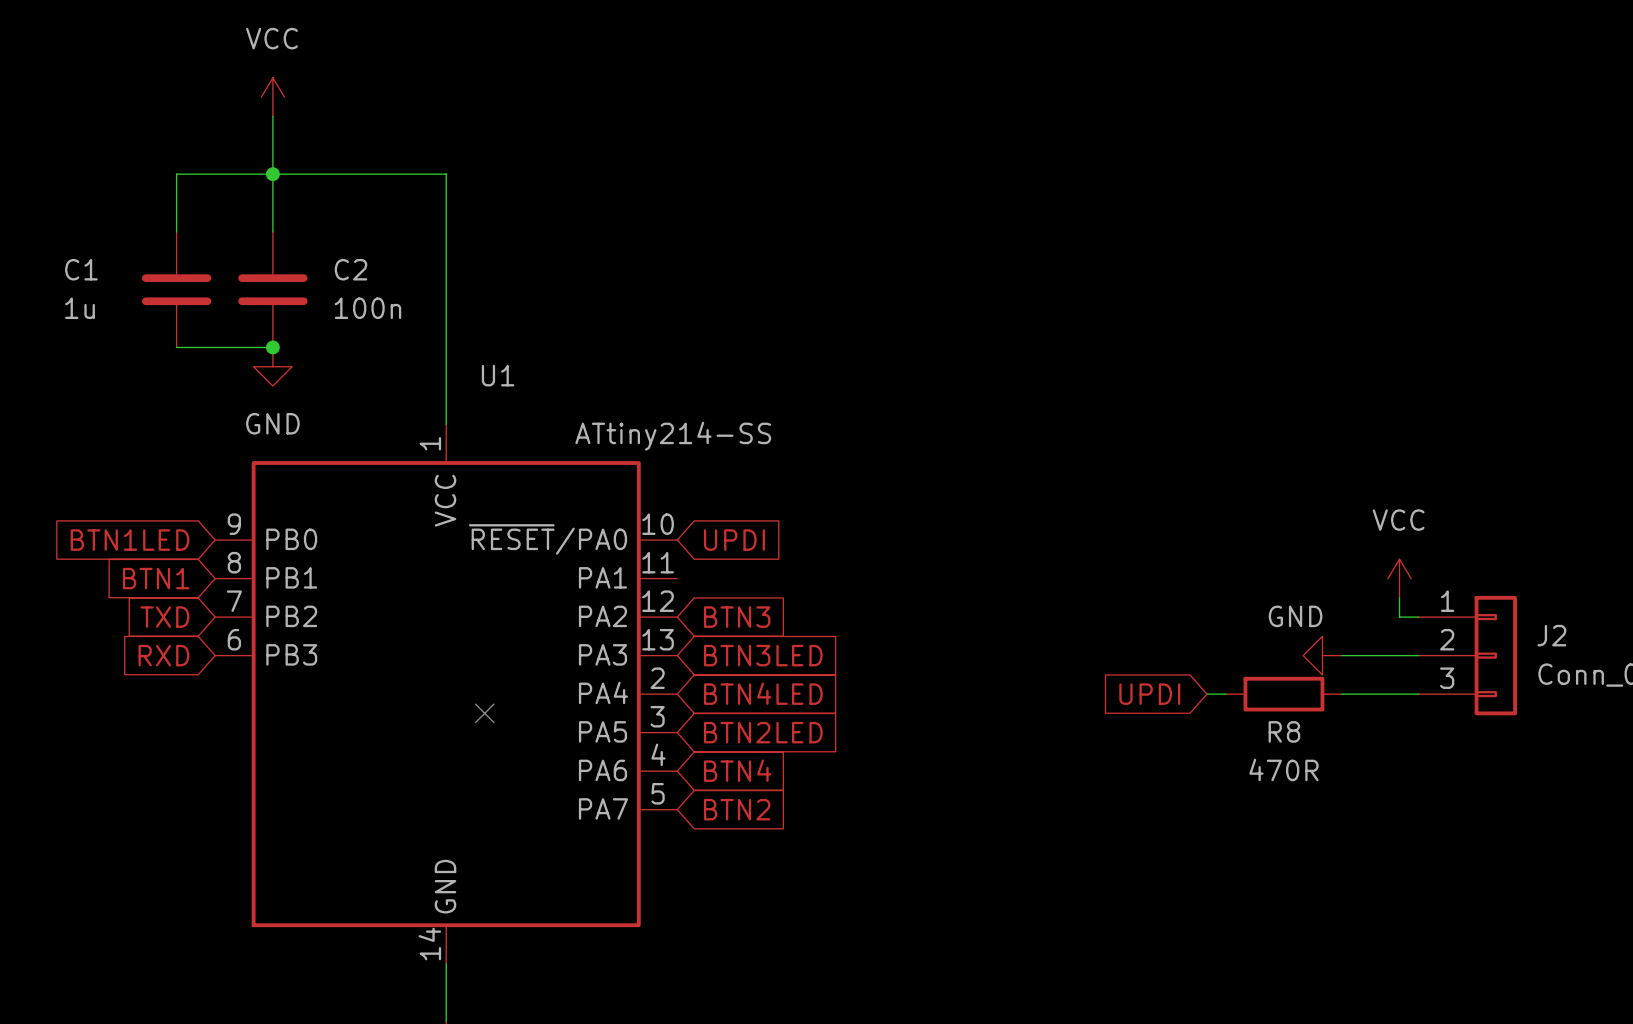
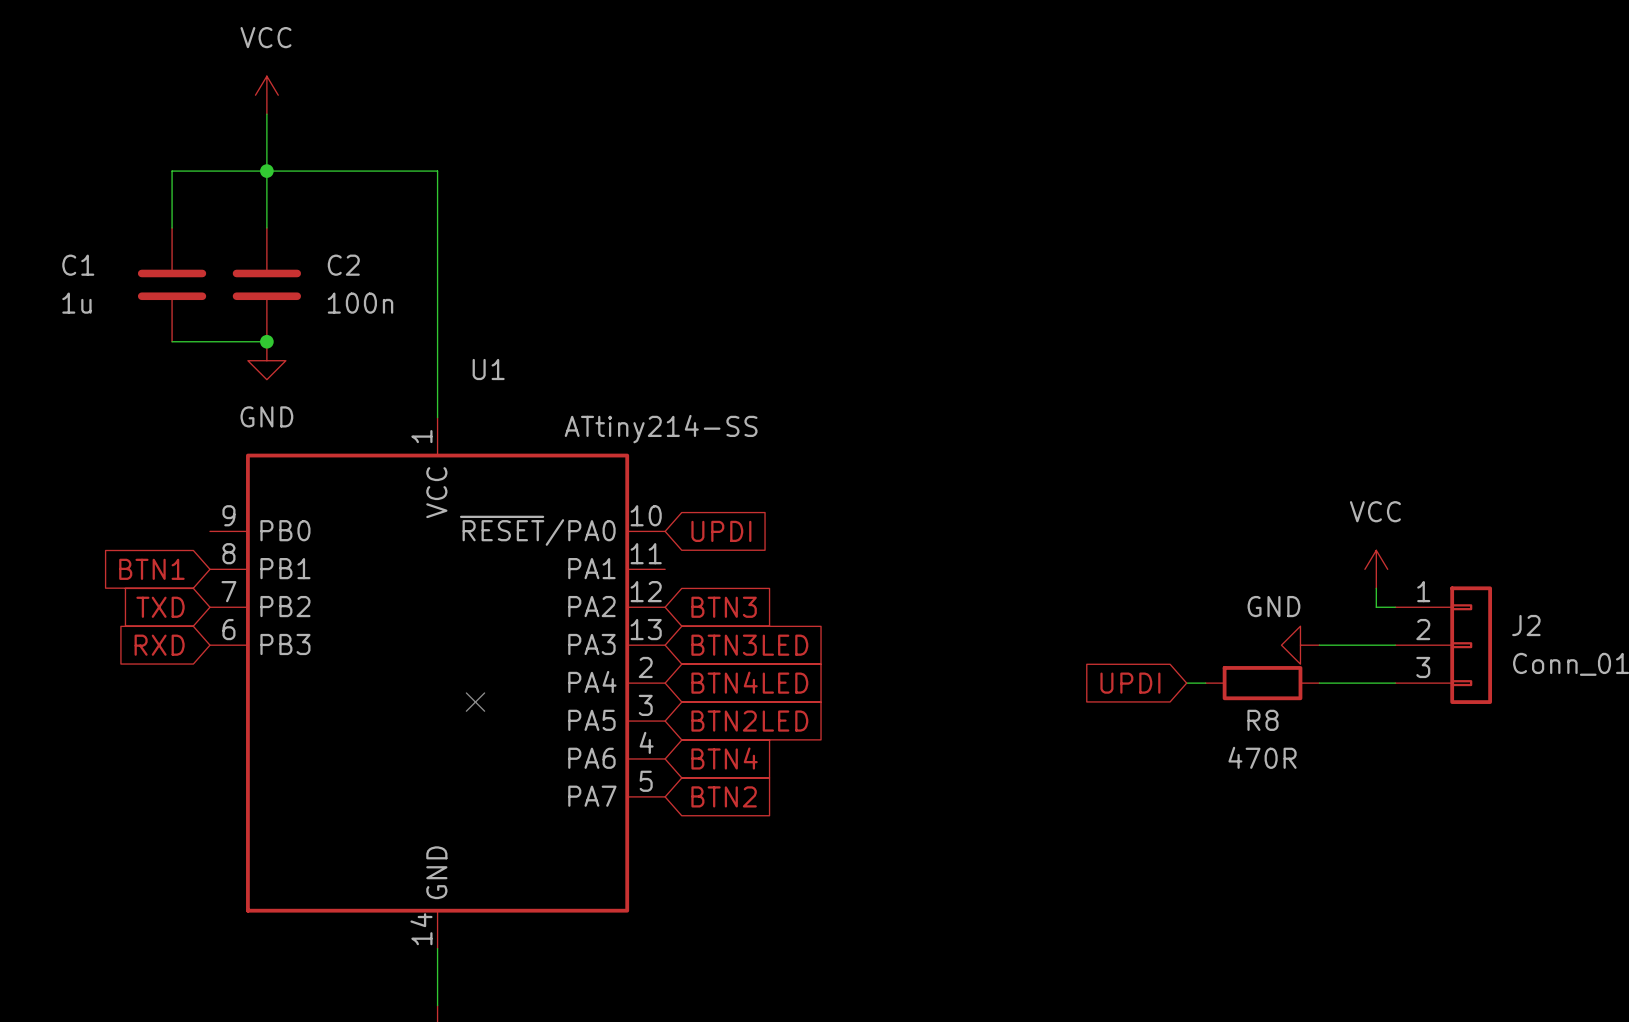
global label: BTN1LED (130, 540) -> none

